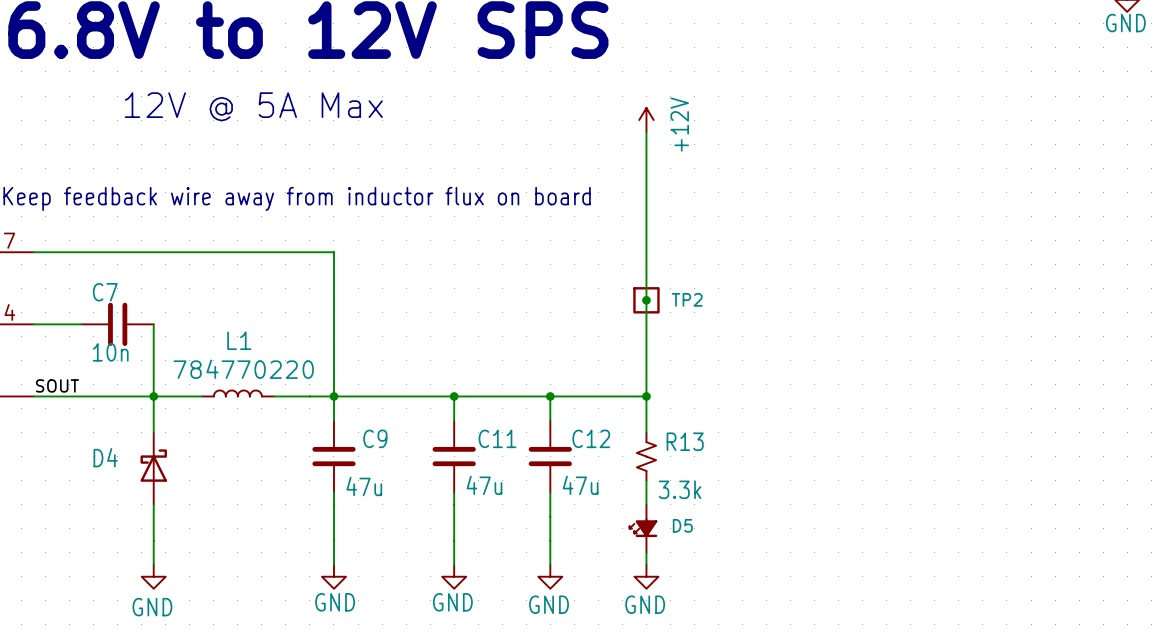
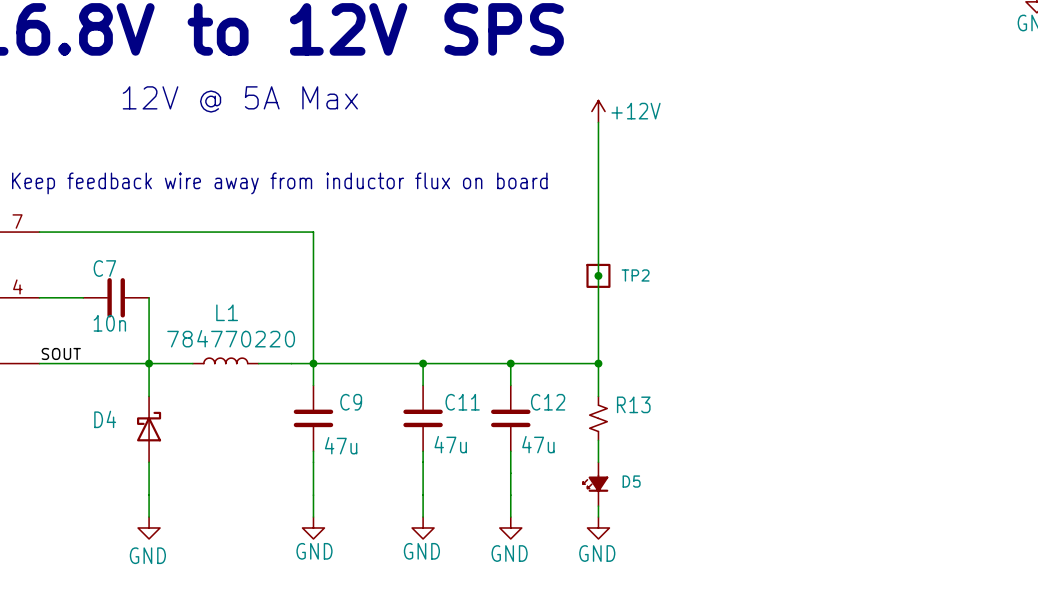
power symbol text rotation: 0° (679, 124) -> 90° clockwise (636, 111)
R13 value: 3.3k (680, 489) -> none

